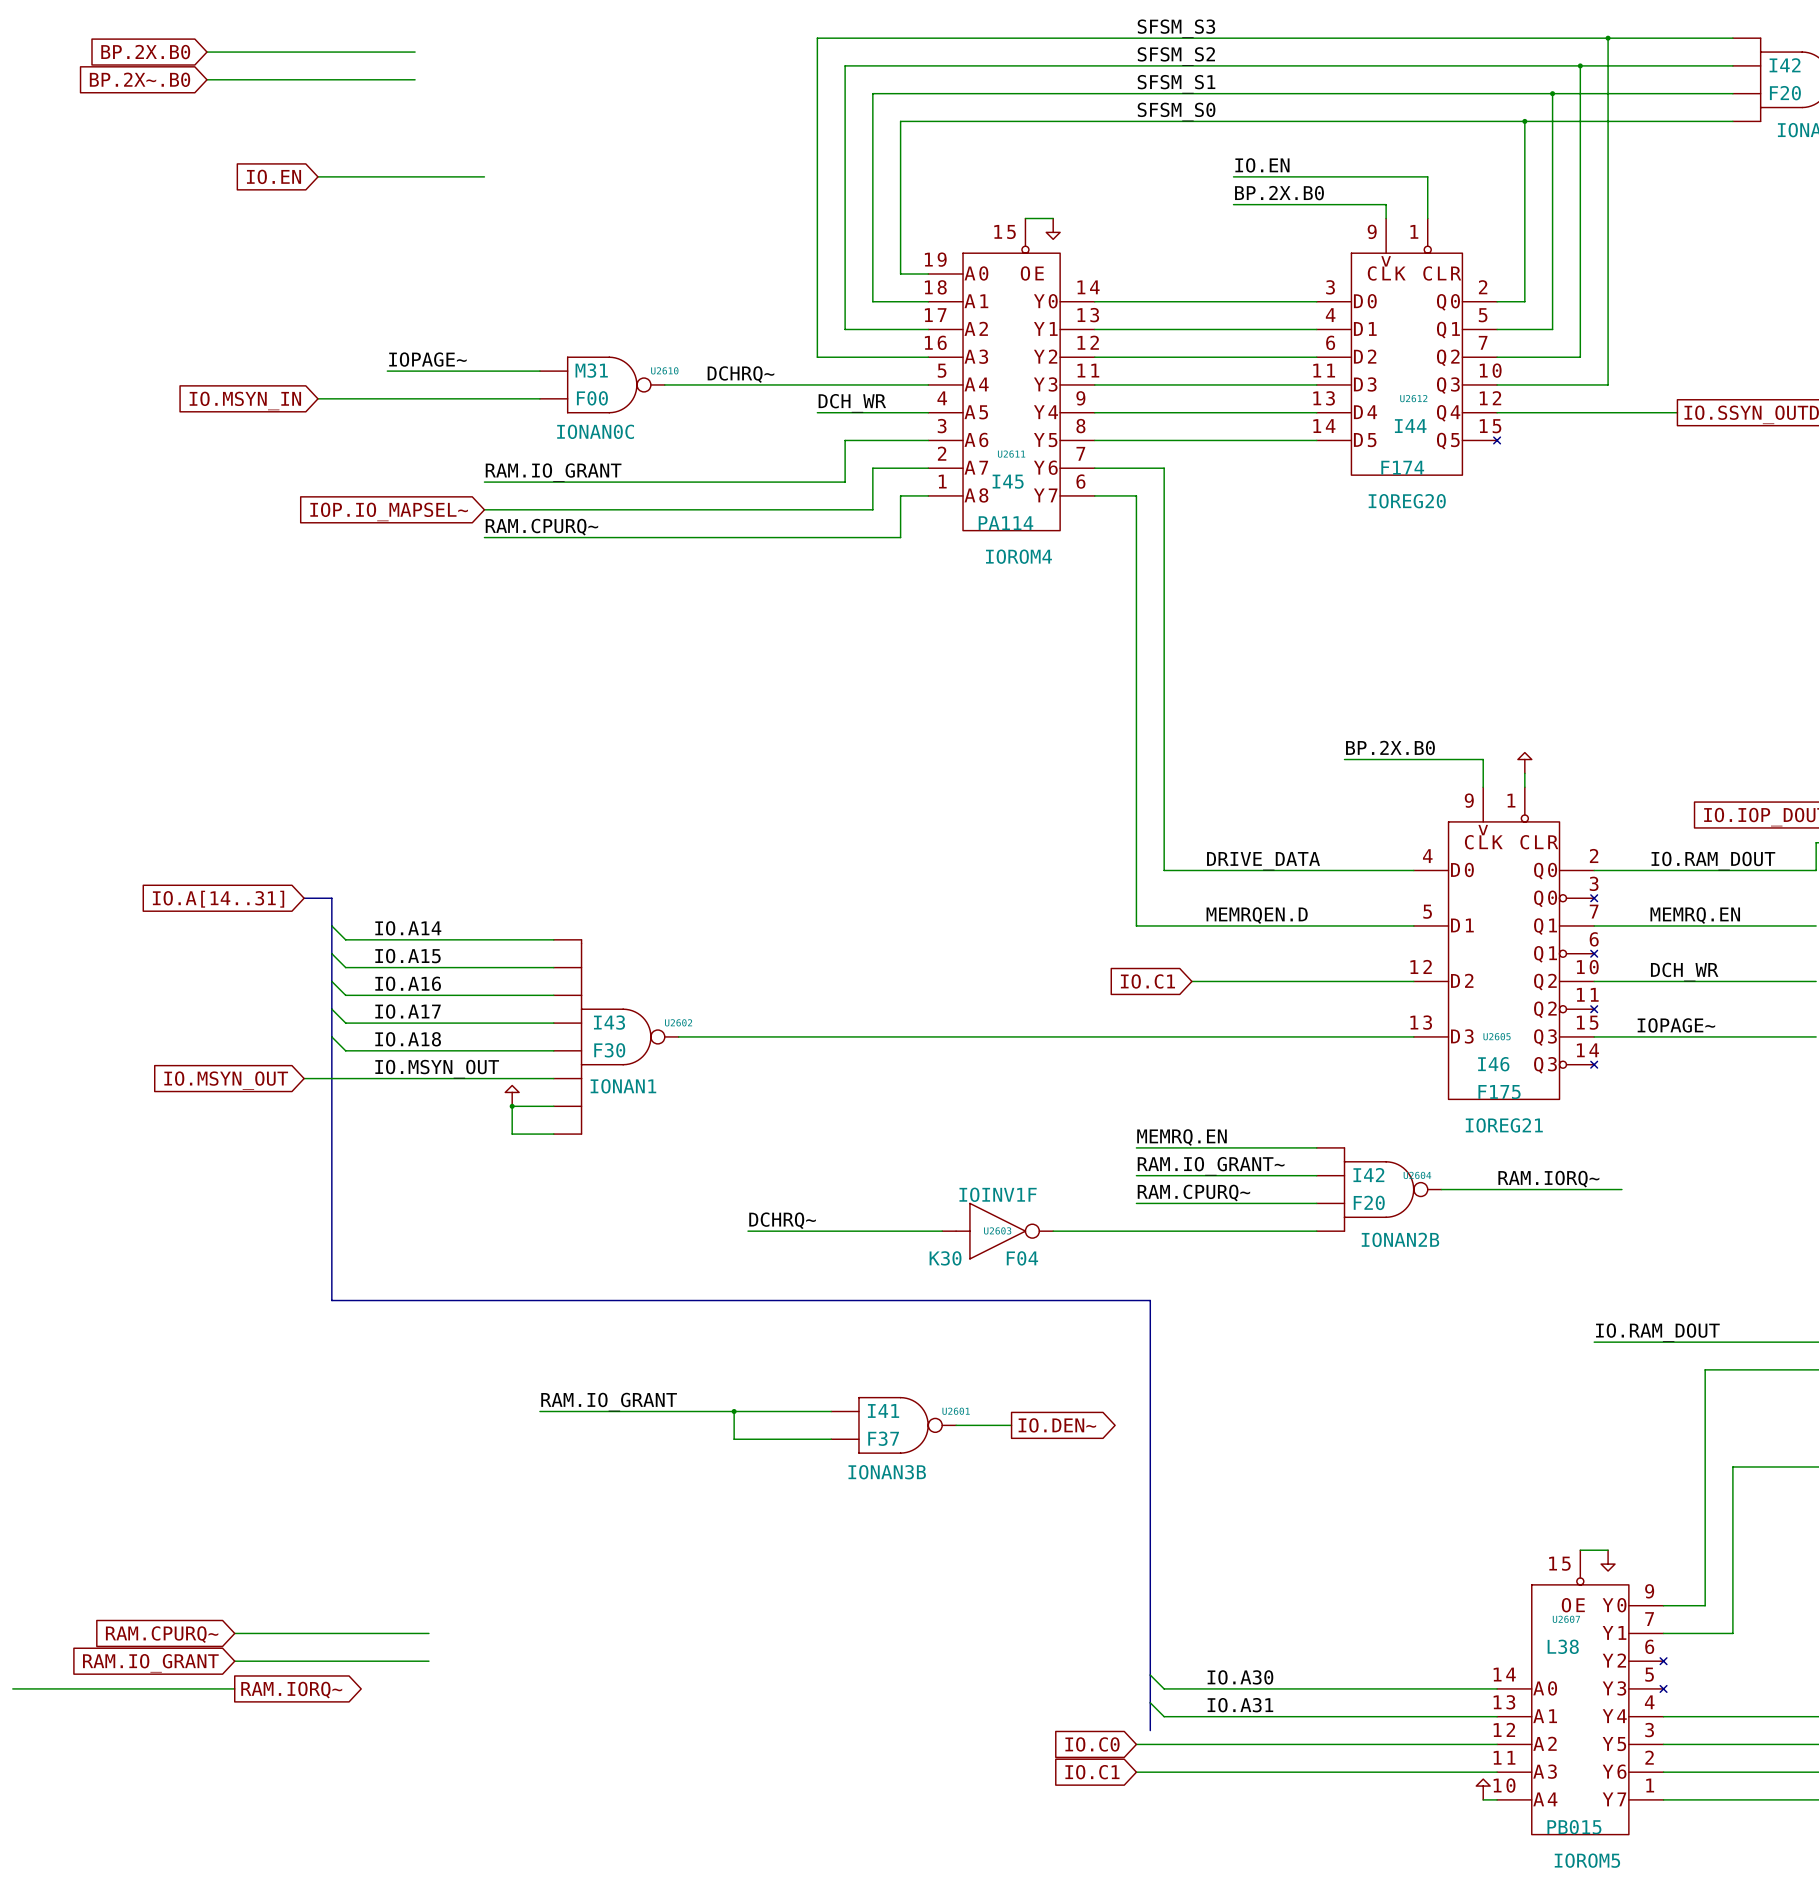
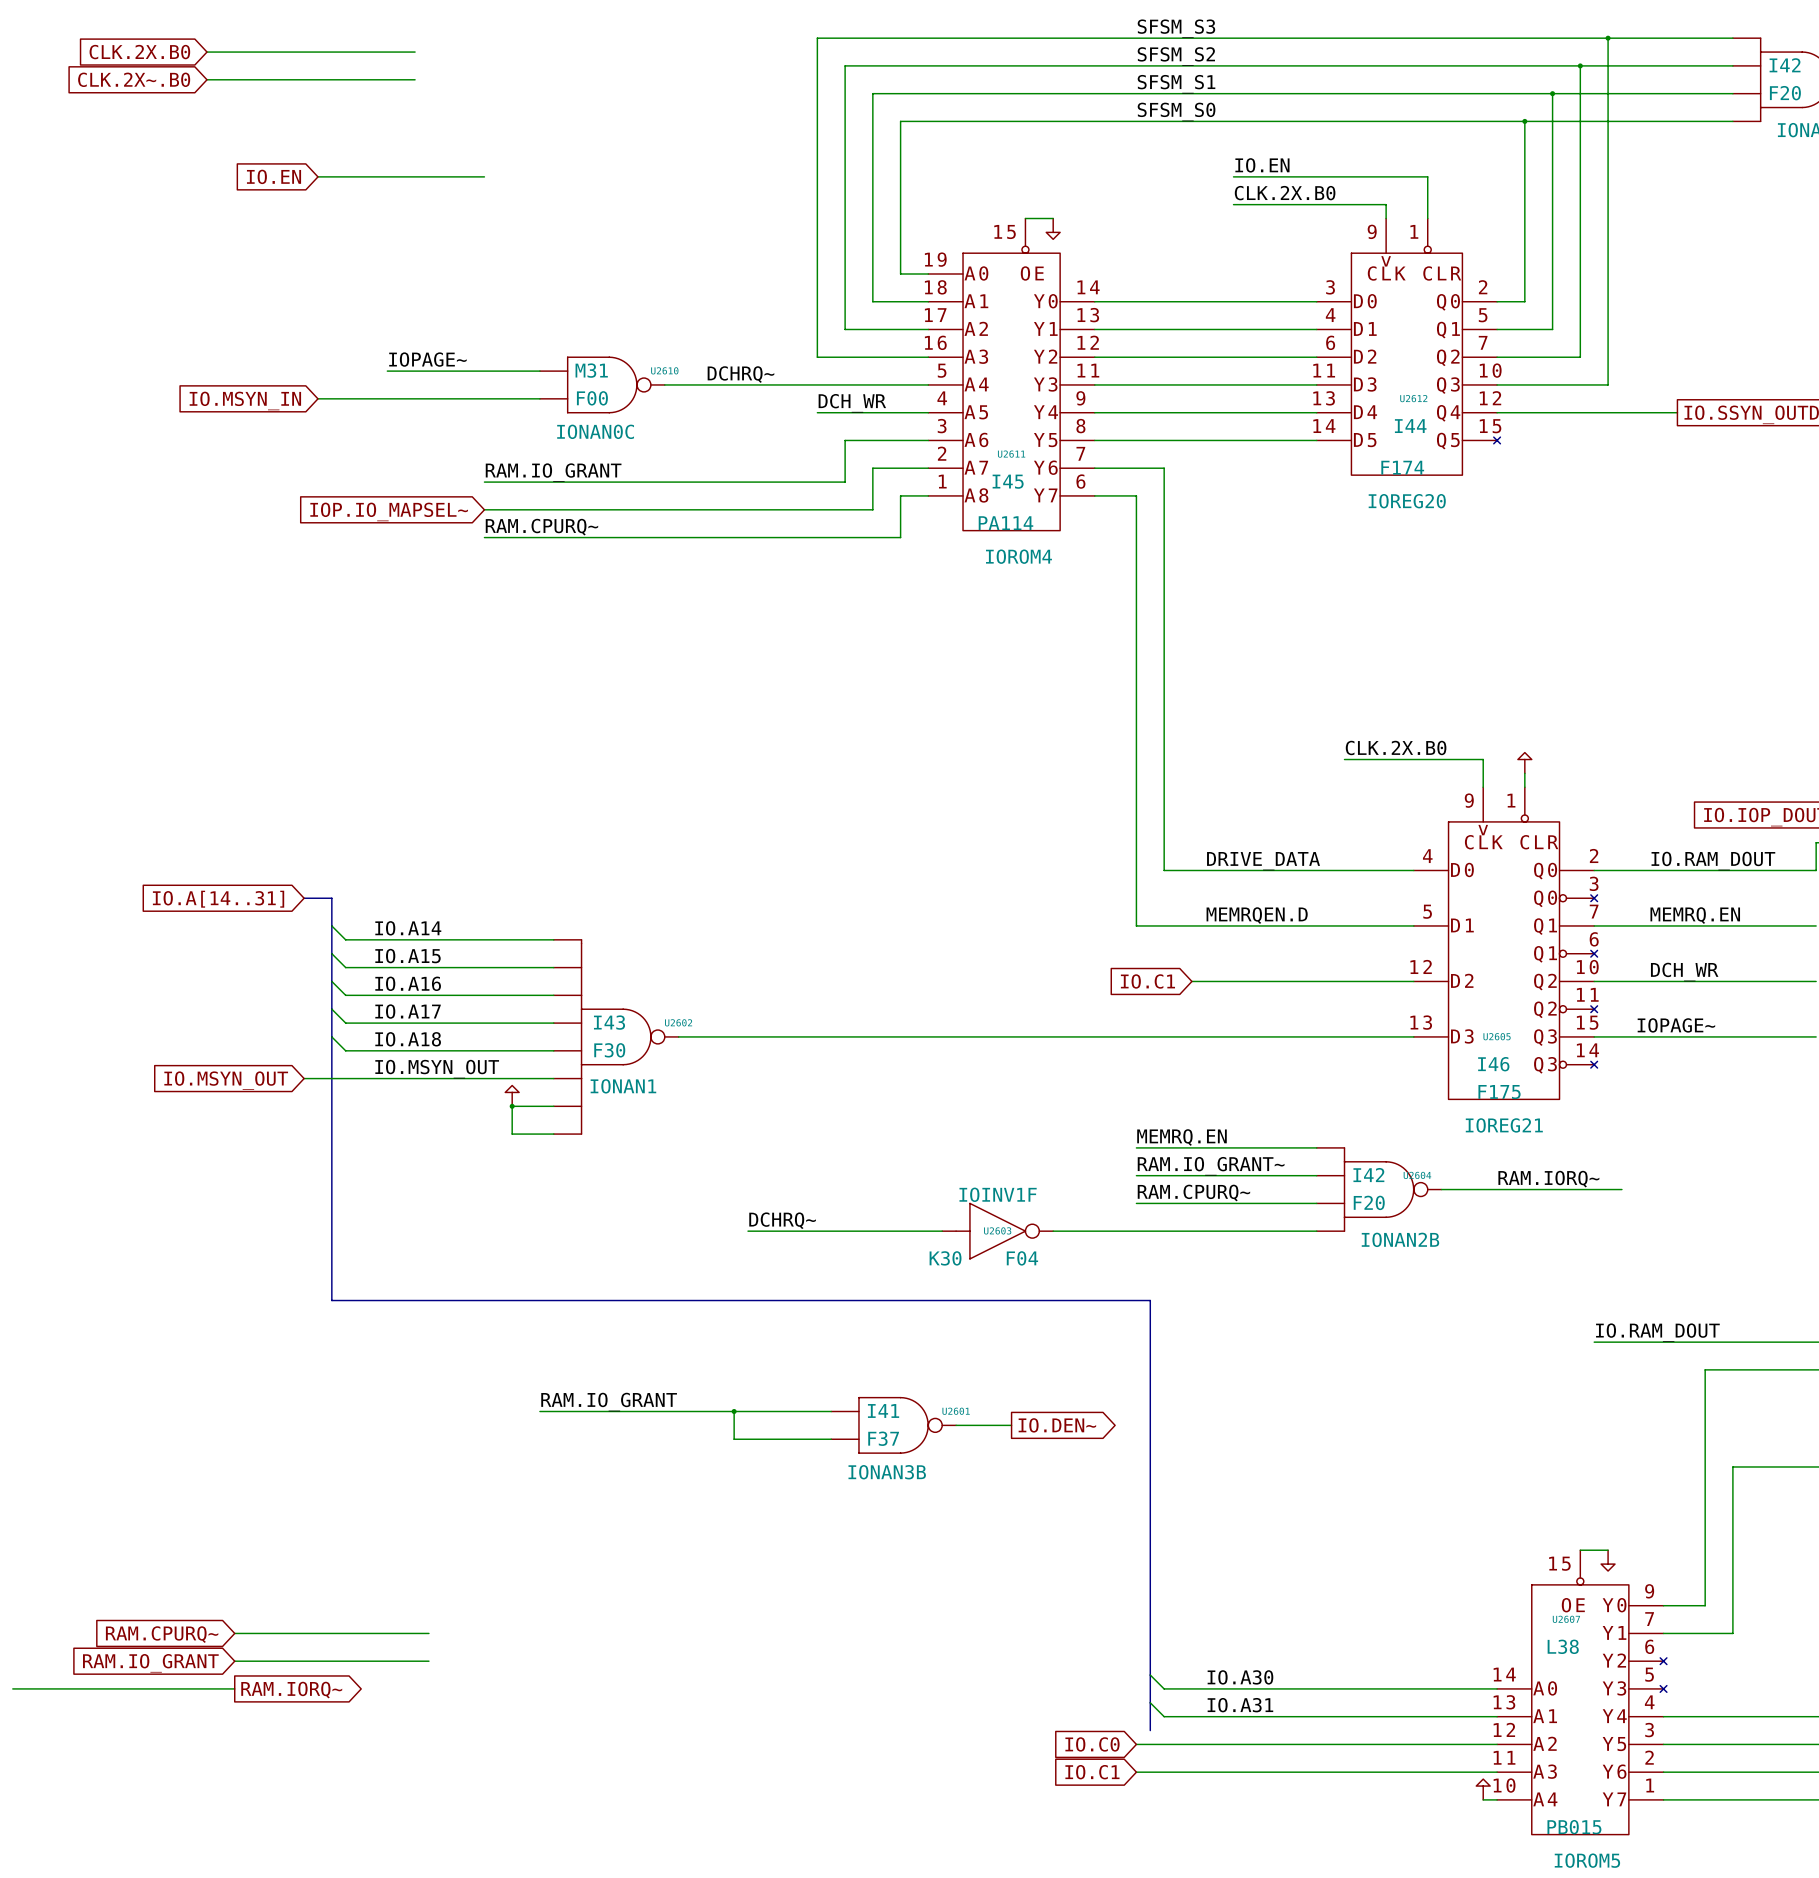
global label: BP.2X.B0 (145, 52) -> CLK.2X.B0 (139, 52)
global label: BP.2X~.B0 (139, 79) -> CLK.2X~.B0 (134, 79)
label: BP.2X.B0 (1279, 193) -> CLK.2X.B0 (1285, 193)
label: BP.2X.B0 (1390, 747) -> CLK.2X.B0 (1396, 747)

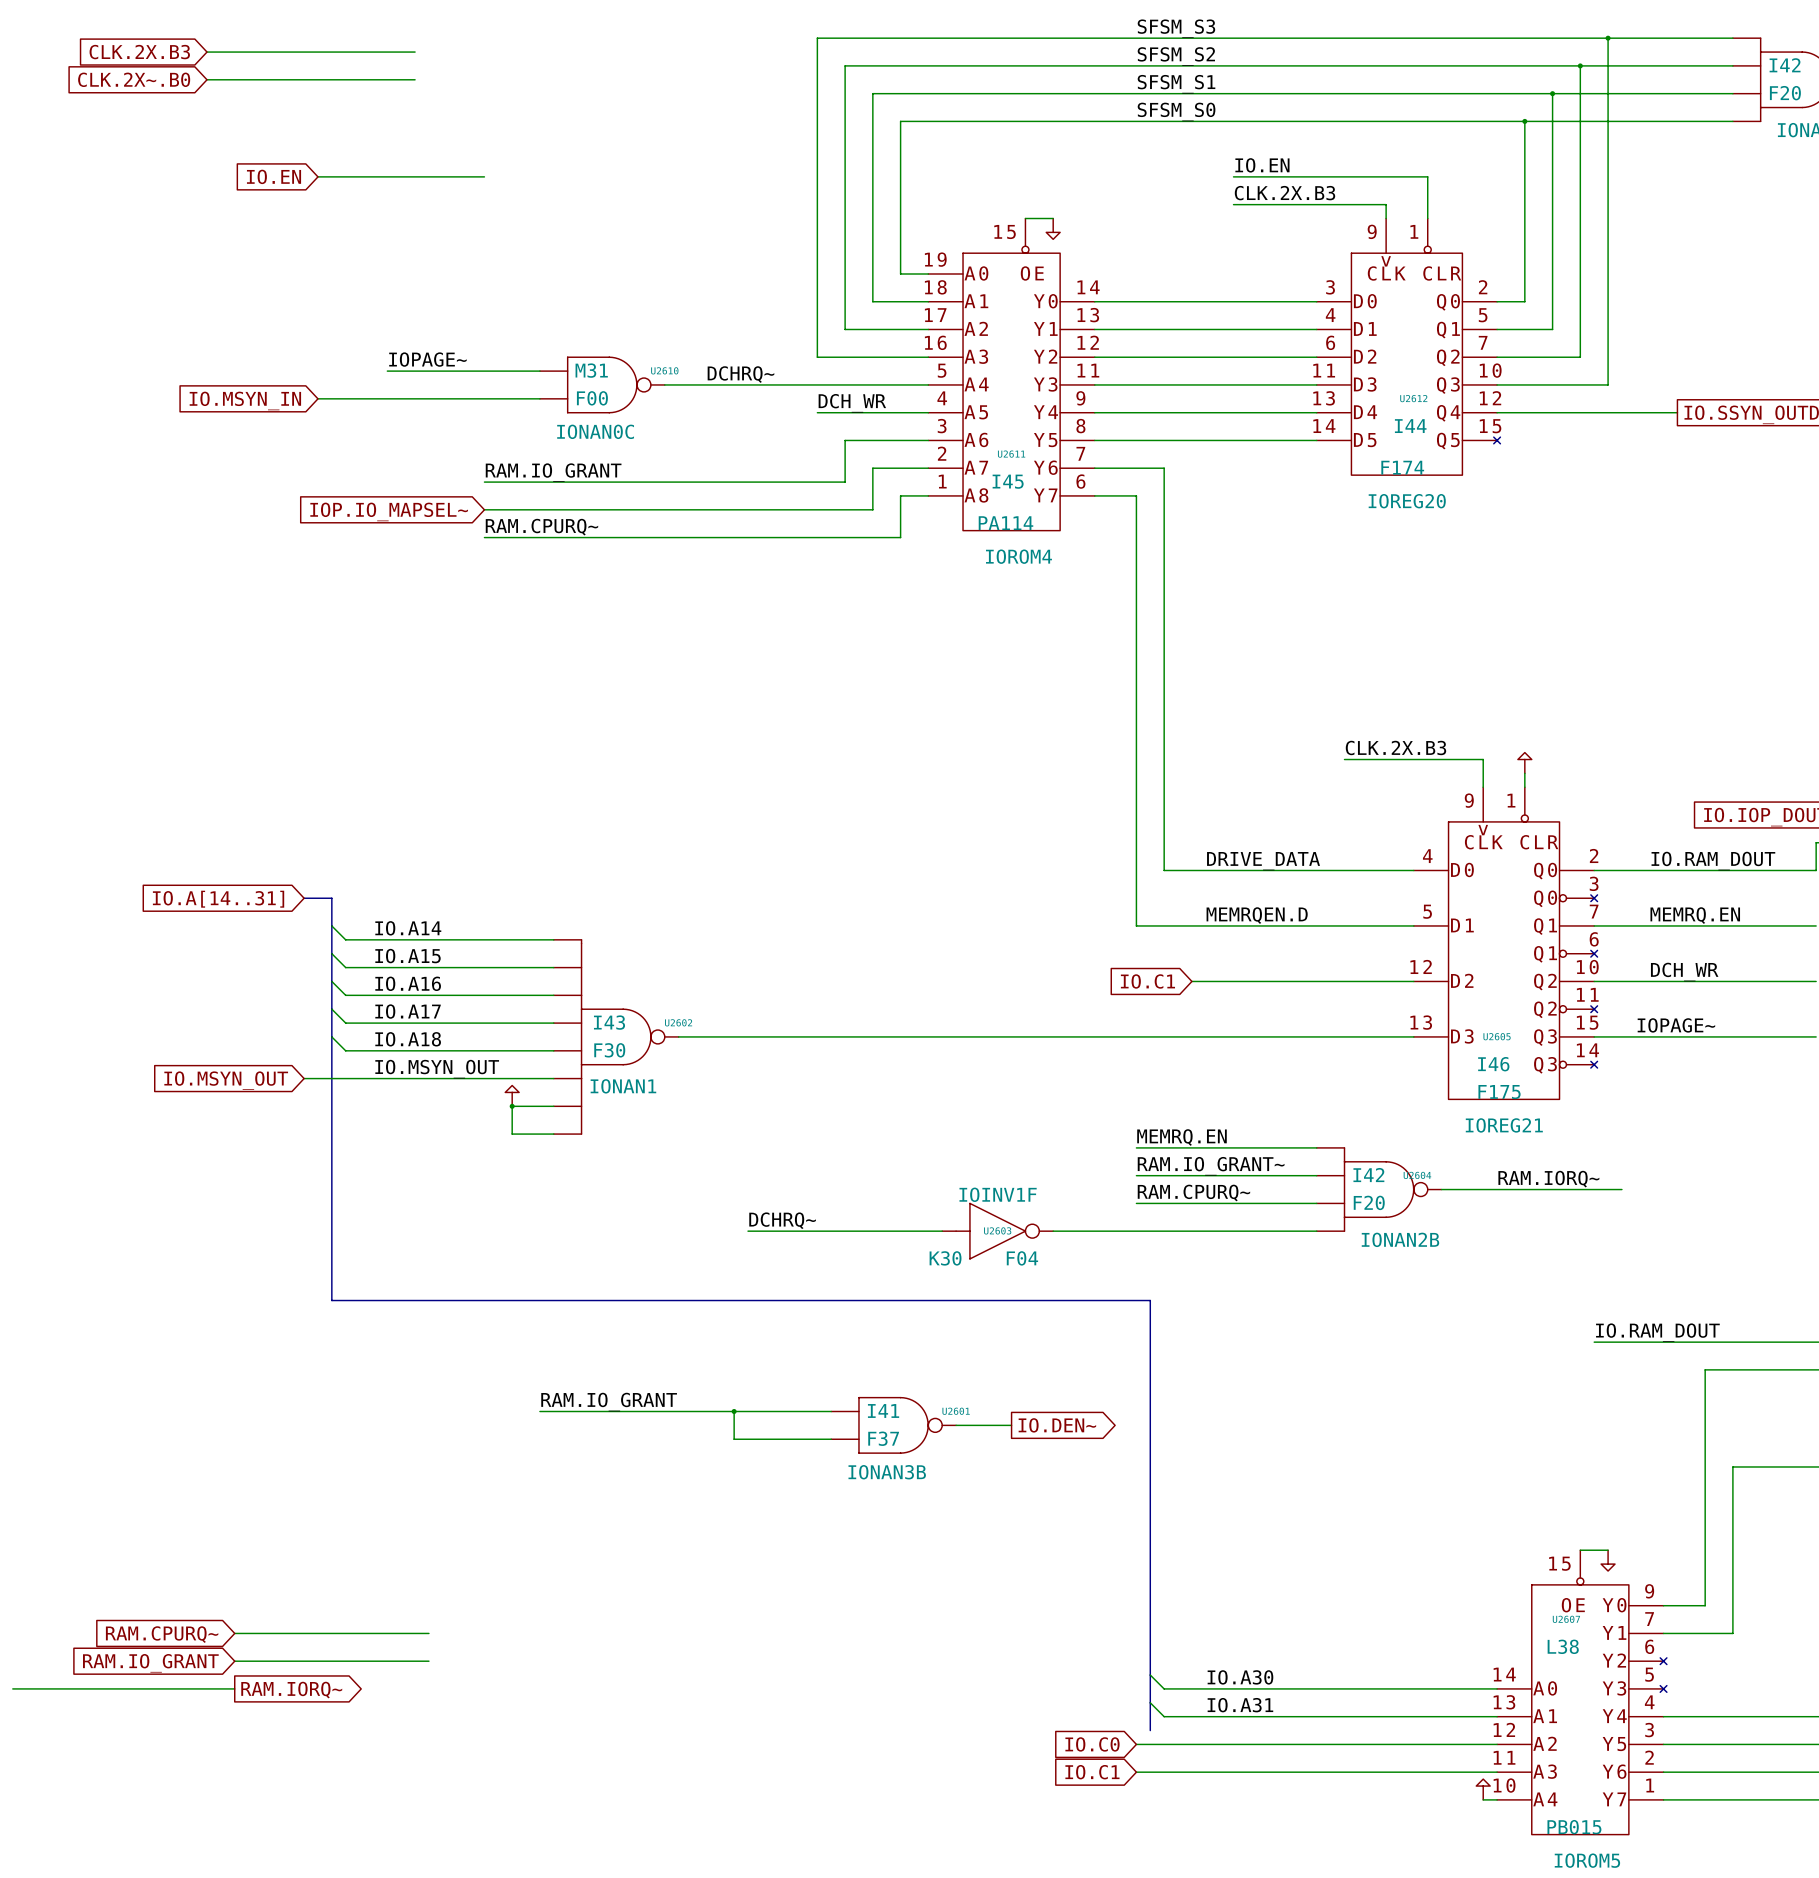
global label: CLK.2X.B0 (139, 52) -> CLK.2X.B3 (139, 52)
label: CLK.2X.B0 (1285, 193) -> CLK.2X.B3 (1285, 193)
label: CLK.2X.B0 (1396, 747) -> CLK.2X.B3 (1395, 747)

